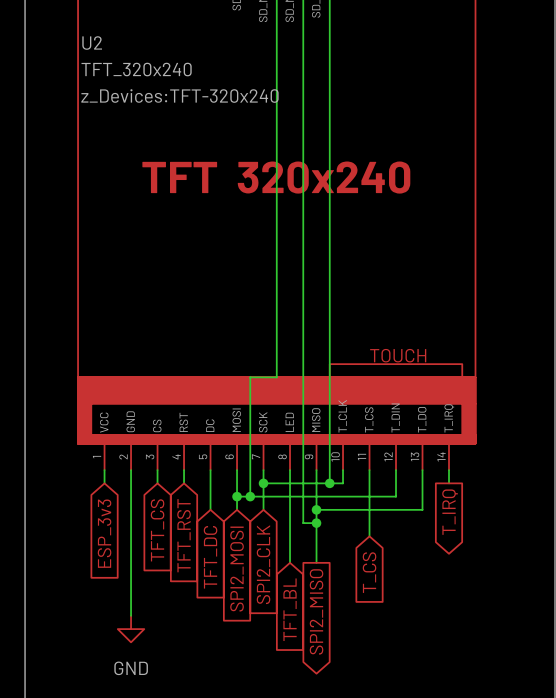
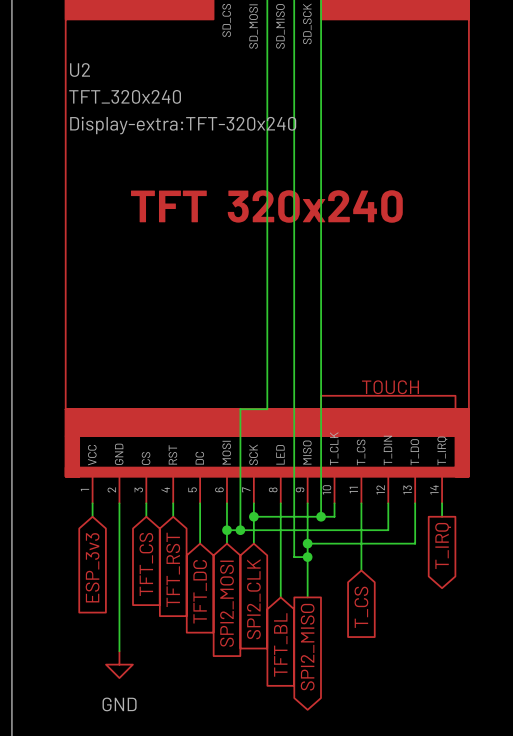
U2 text: z_Devices:TFT-320x240 (179, 96) -> Display-extra:TFT-320x240 (183, 125)

